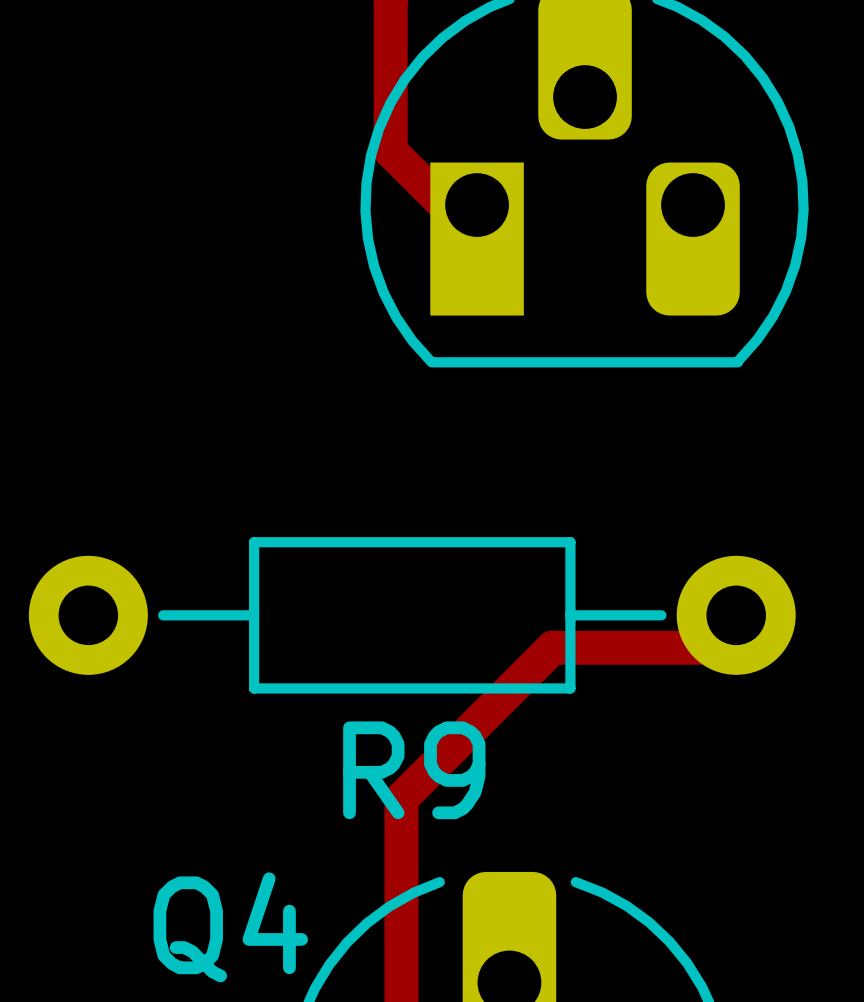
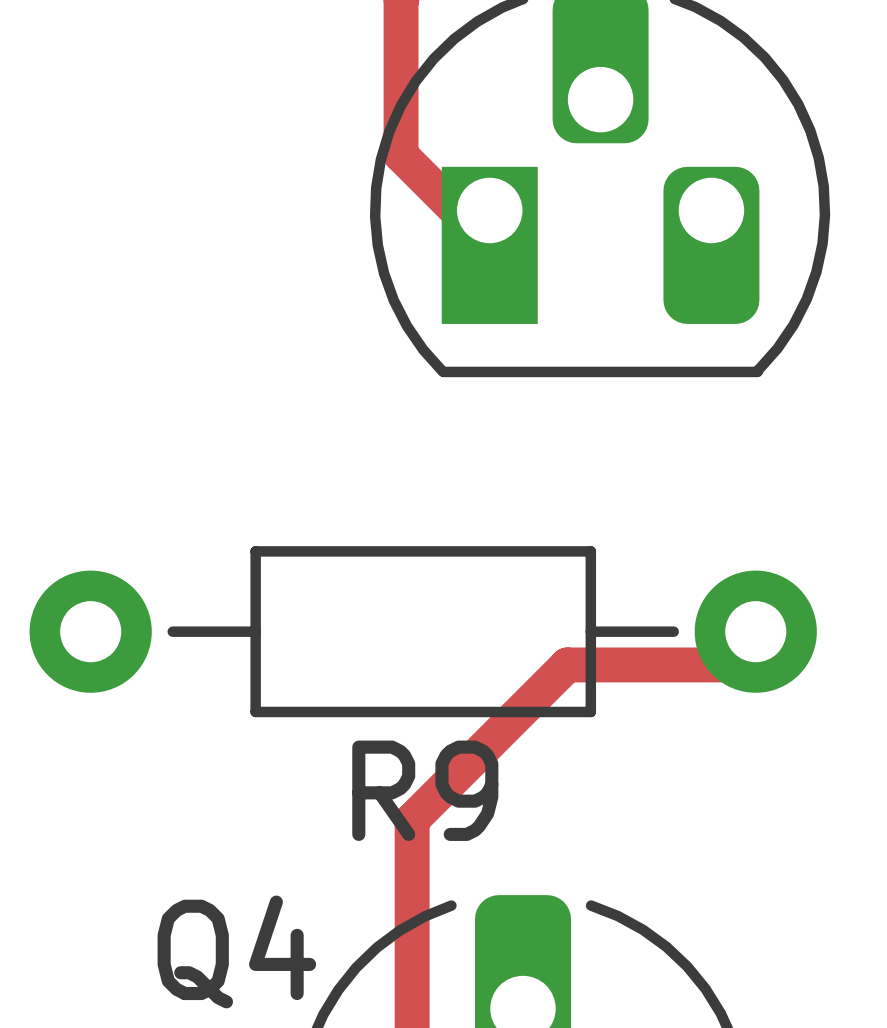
R9 footprint: [28, 537, 796, 694] -> [29, 546, 817, 718]

